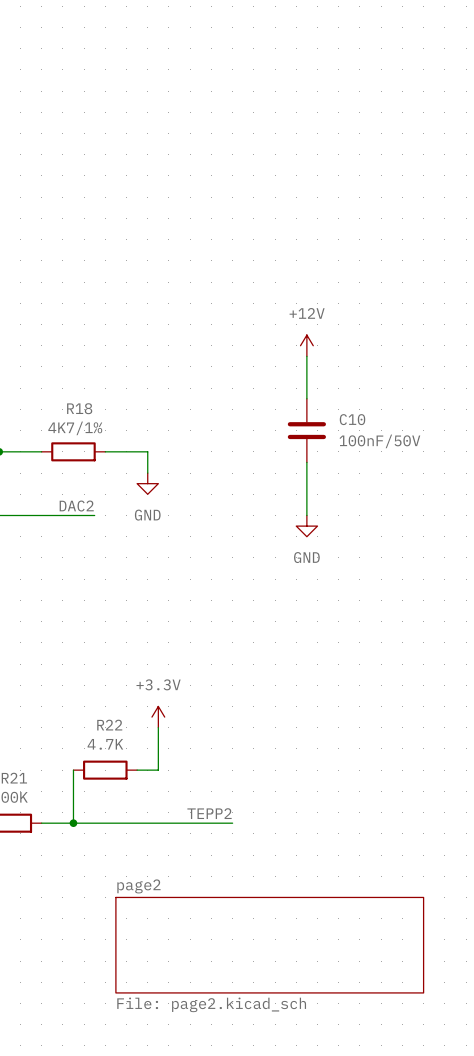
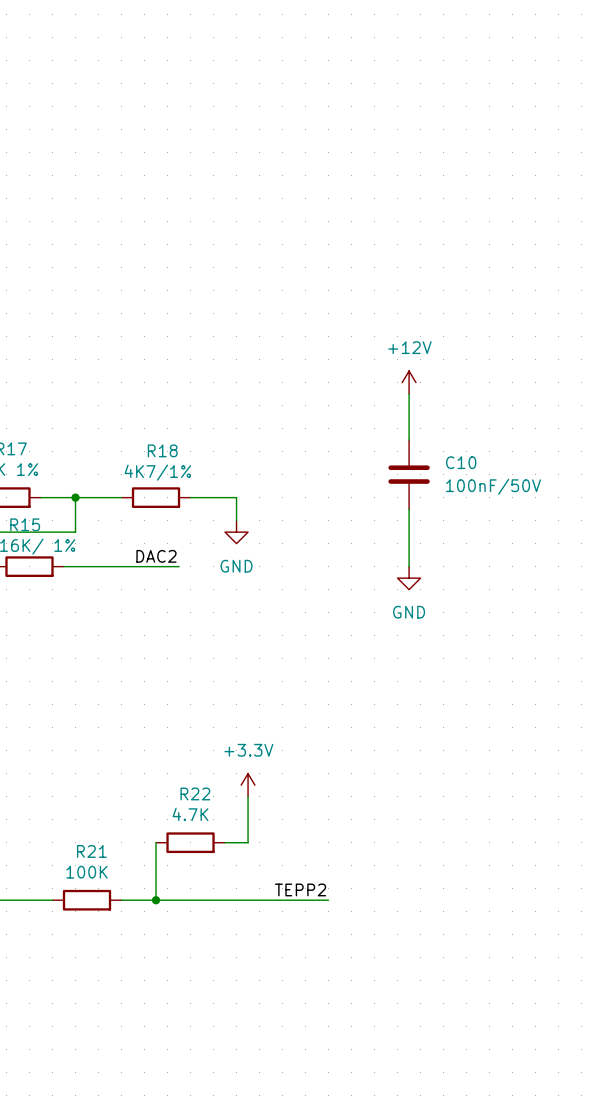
sheet page2: File: page2.kicad_sch (269, 945) -> none

